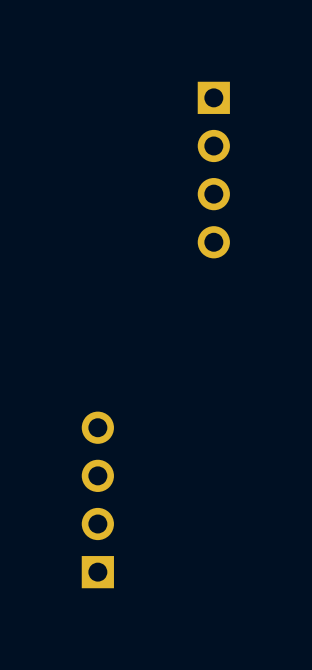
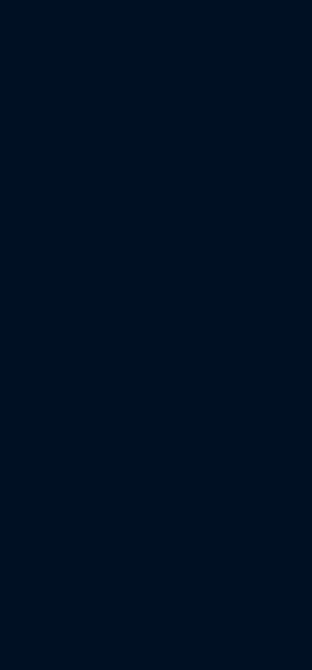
part: (213, 170) -> none
part: (97, 499) -> none

